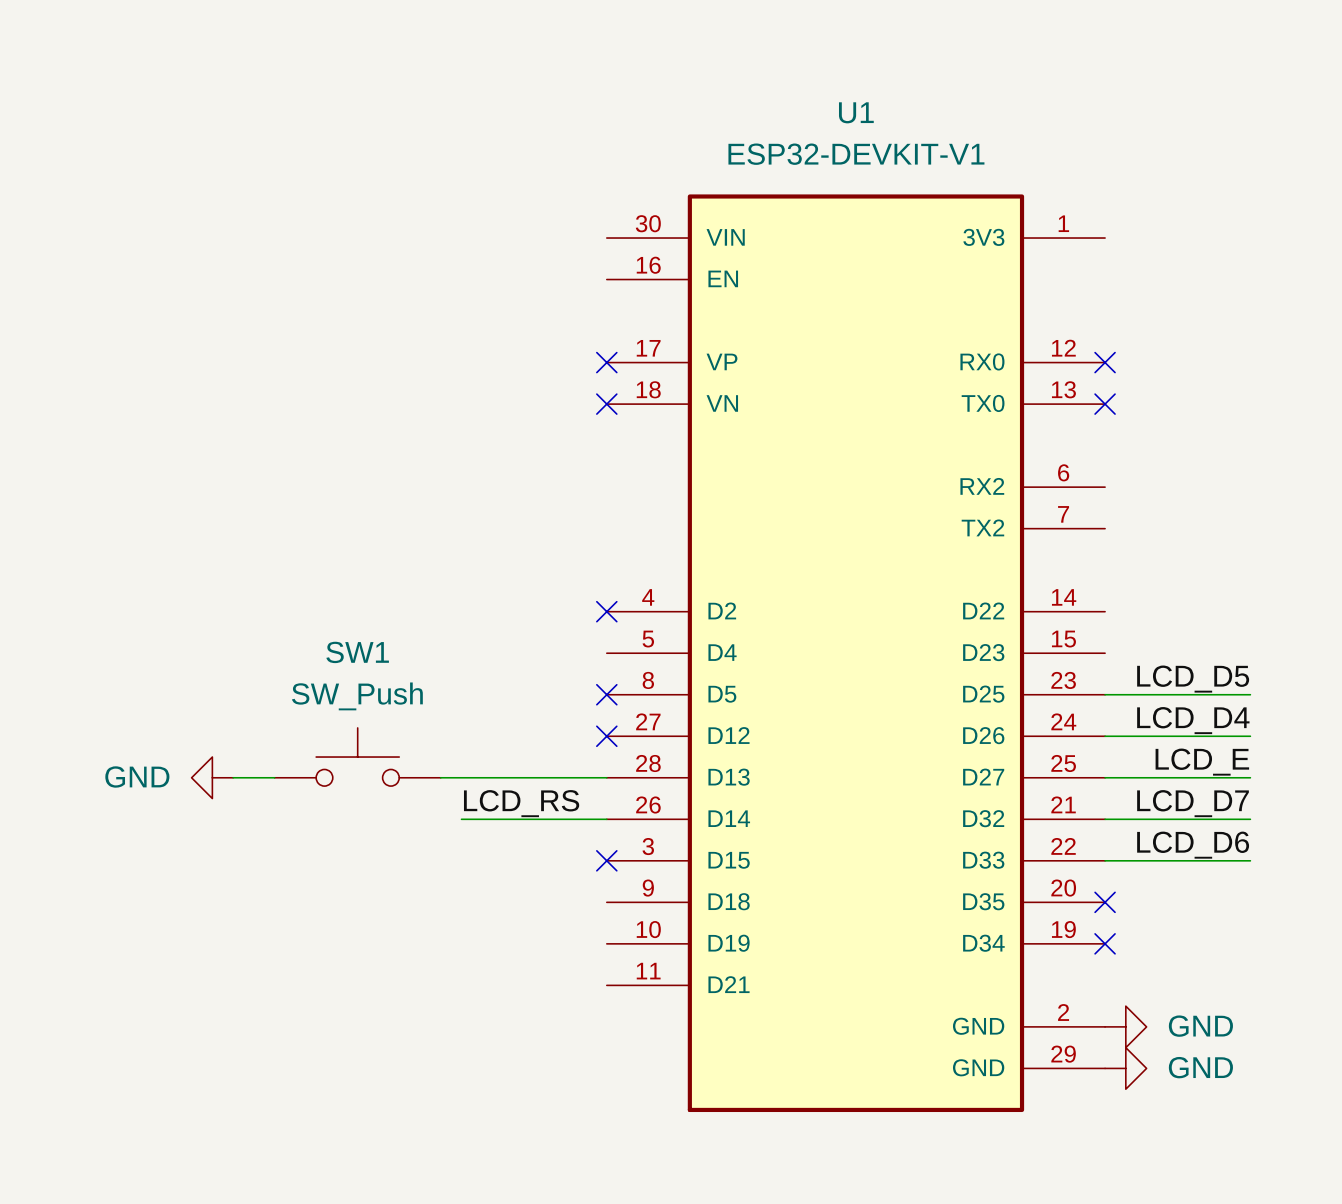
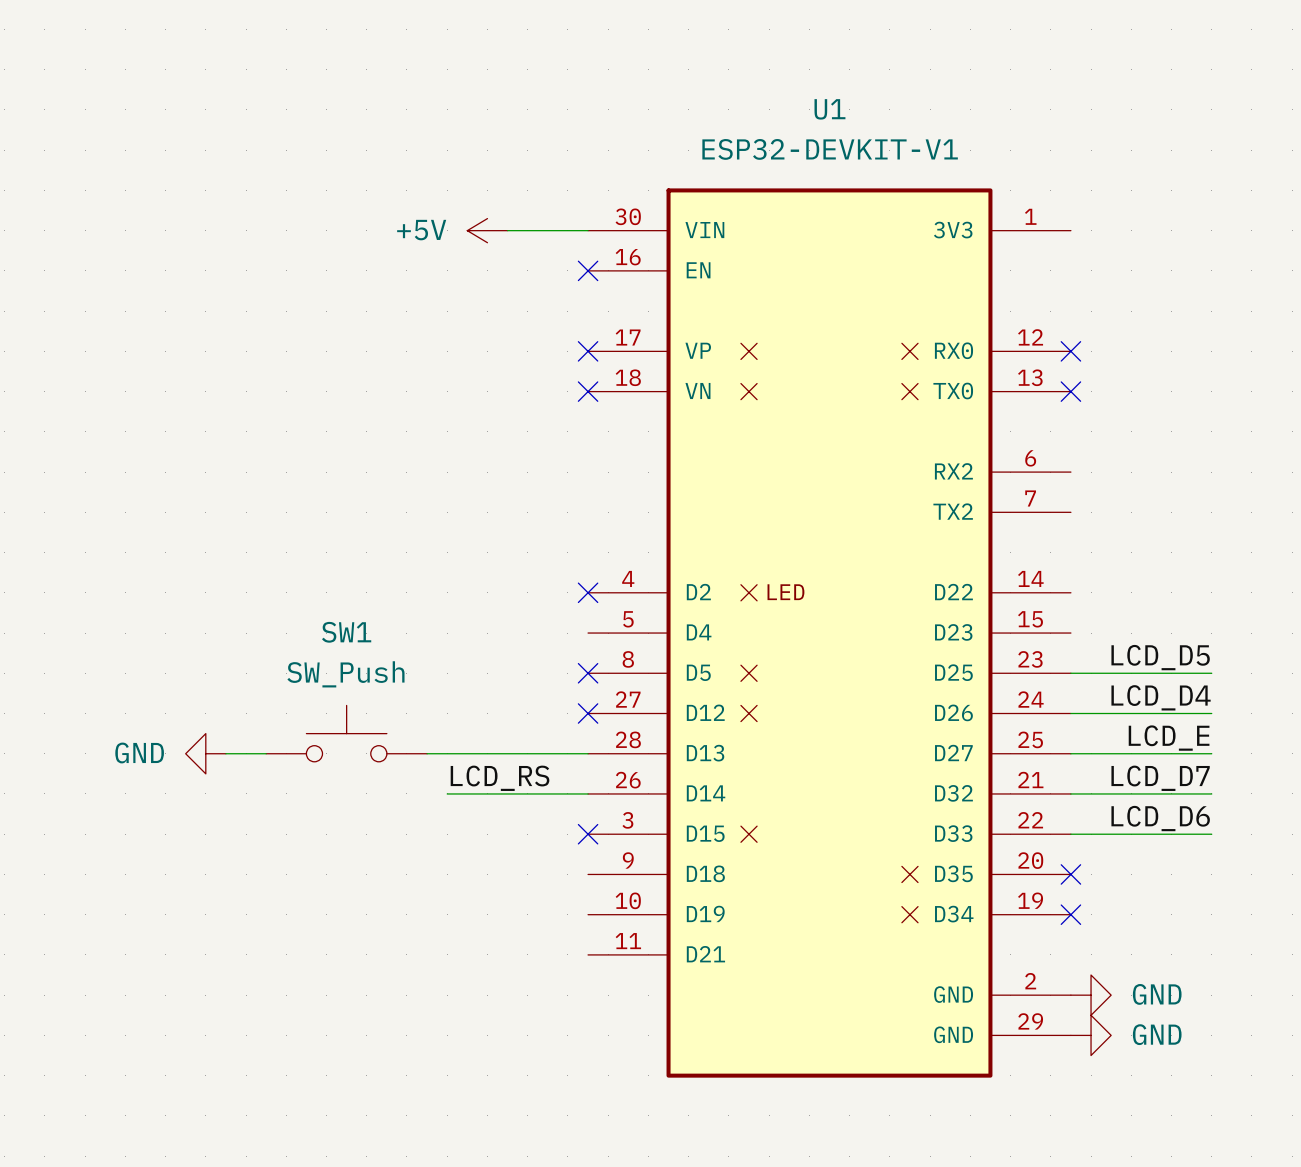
U1 symbol: [606, 194, 1106, 1113] -> [588, 188, 1071, 1078]
power symbol: none -> +5V (487, 230)
wire: none -> (507, 230) (588, 230)
no-connect mark: none -> (588, 270)

